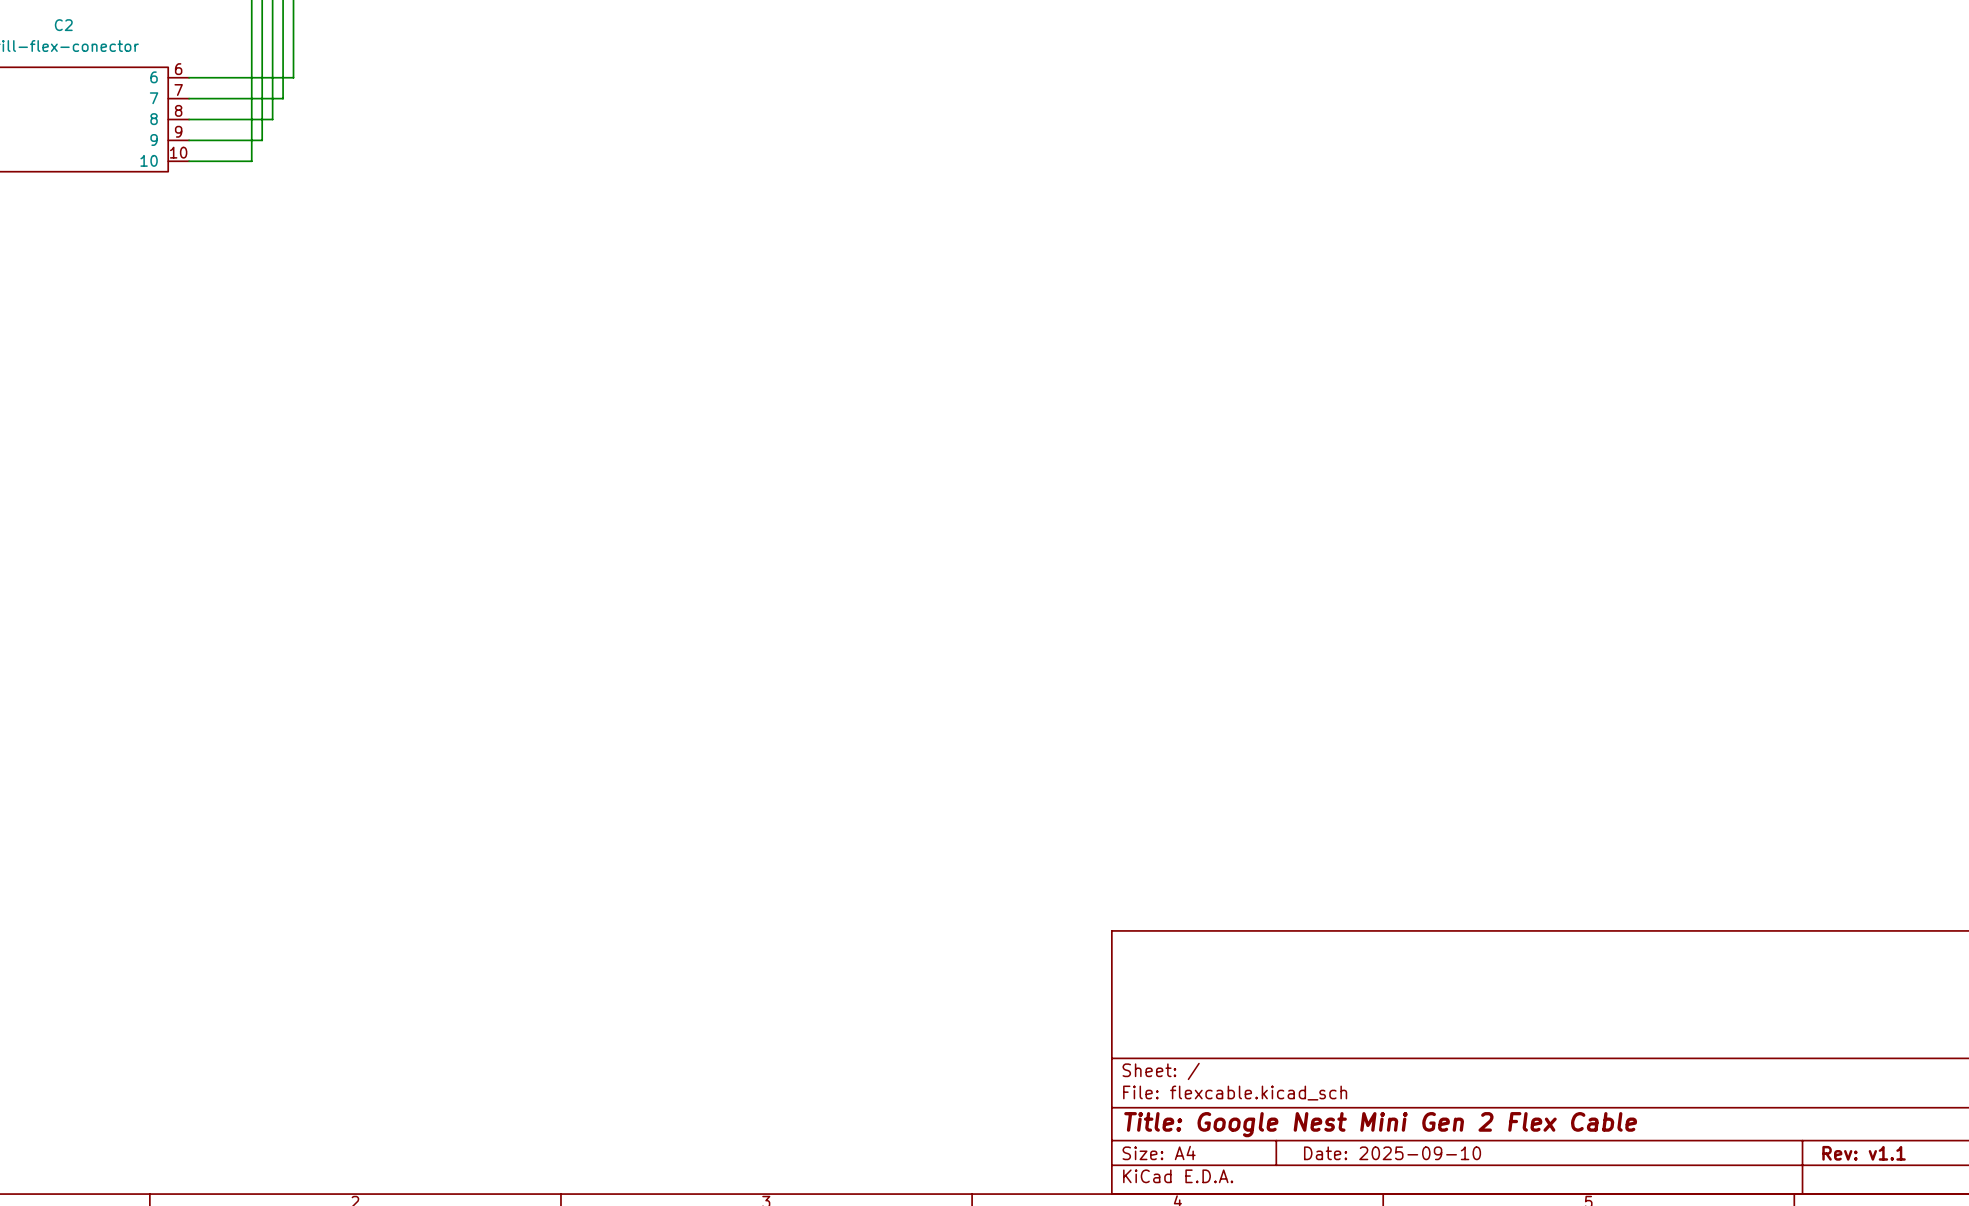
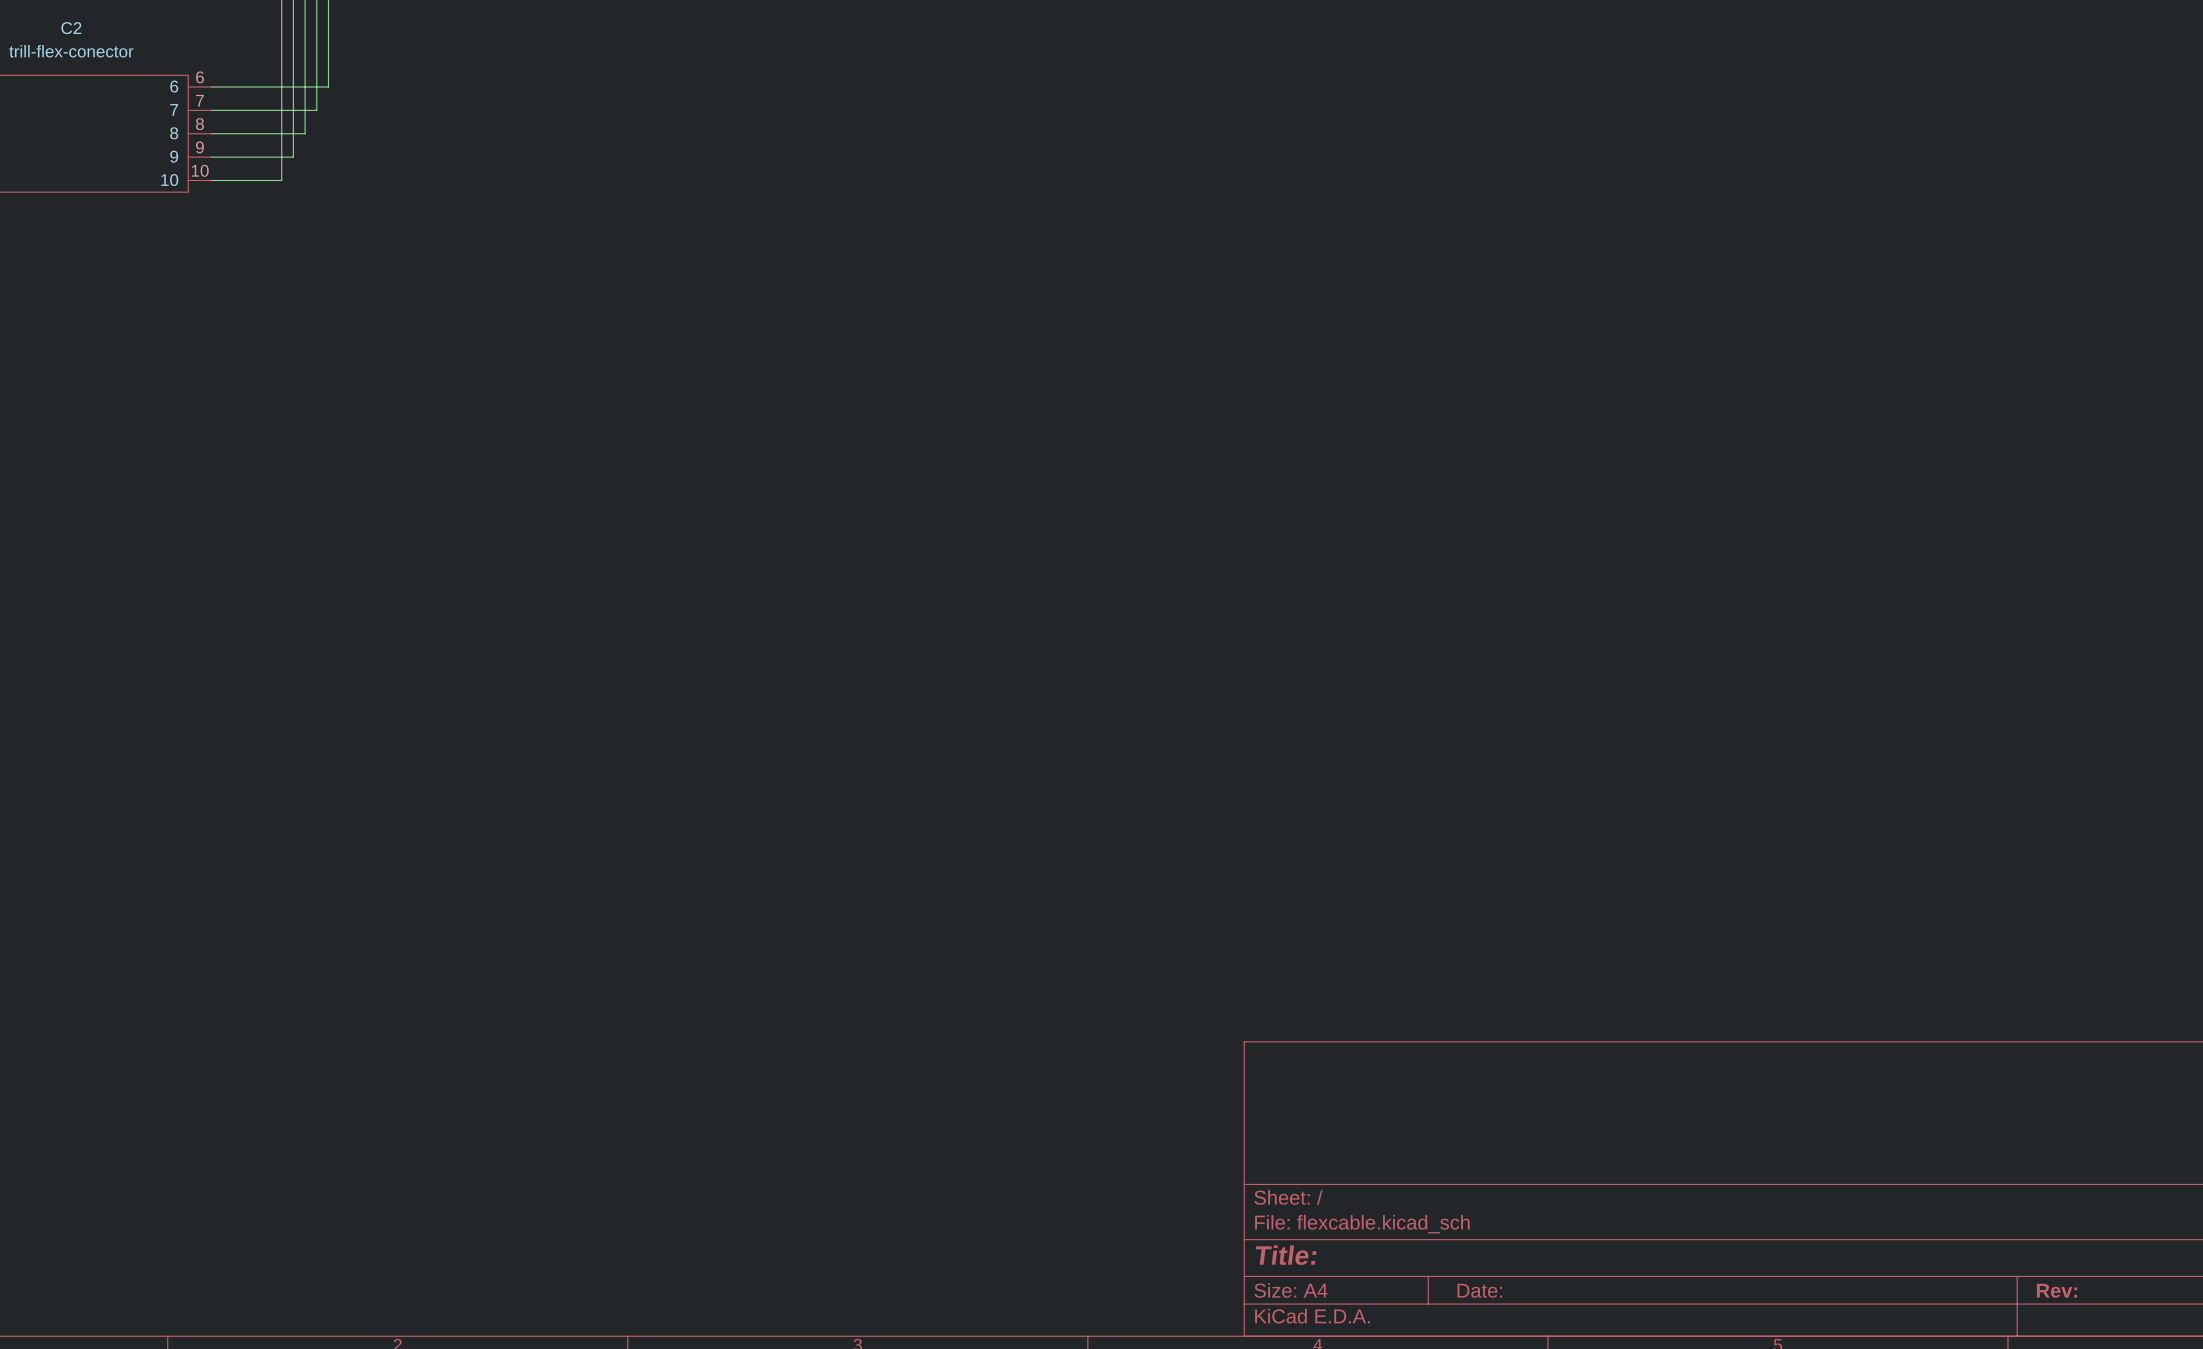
title block: Title: Google Nest Mini Gen 2 Flex Cable (1380, 1124) -> Title: (1286, 1255)
title block: Date: 2025-09-10 (1392, 1153) -> Date: (1479, 1290)
title block: Rev: v1.1 (1864, 1153) -> Rev: (2057, 1290)

